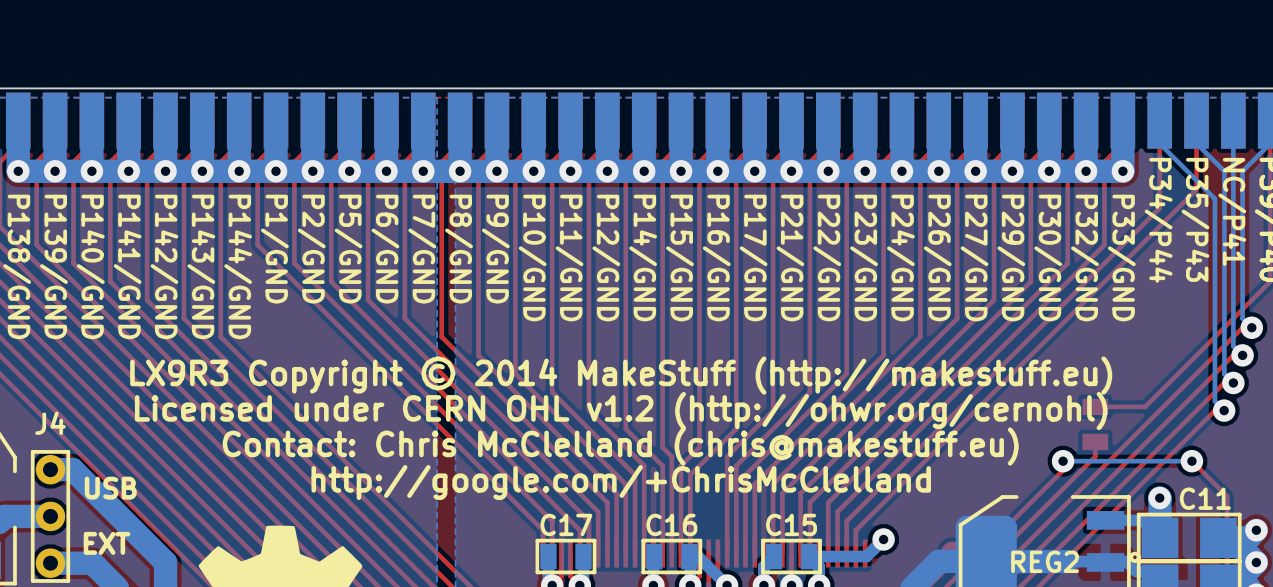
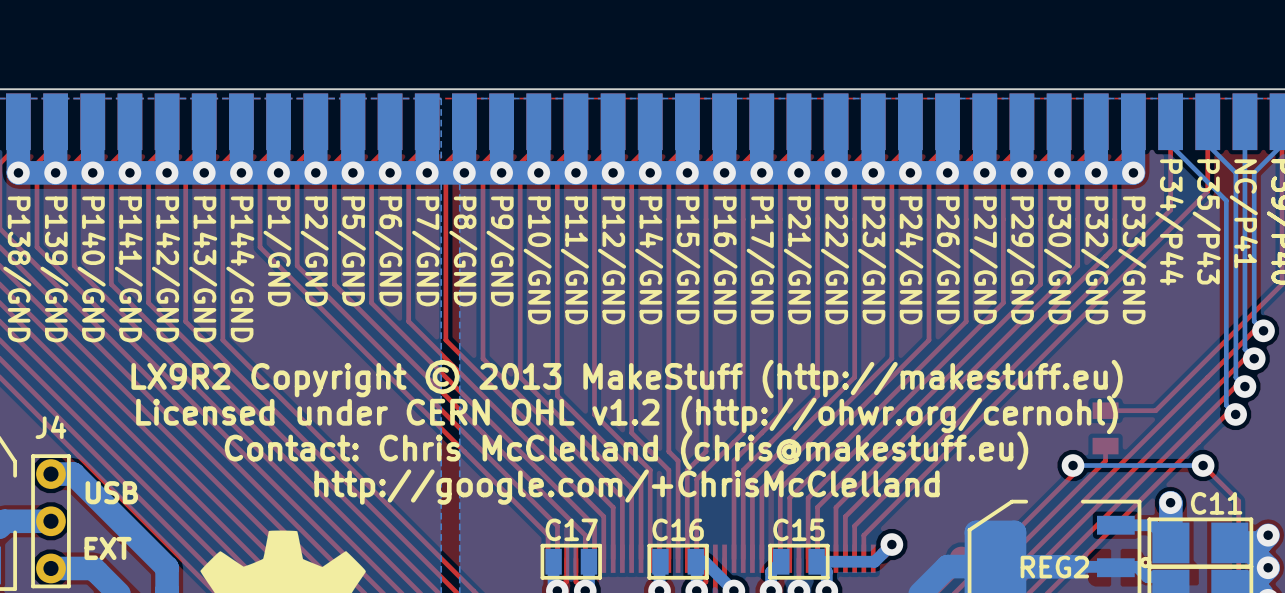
text: LX9R3 Copyright © 2014 MakeStuff (http://makestuff.eu) (621, 375) -> LX9R2 Copyright © 2013 MakeStuff (http://makestuff.eu) (627, 379)

